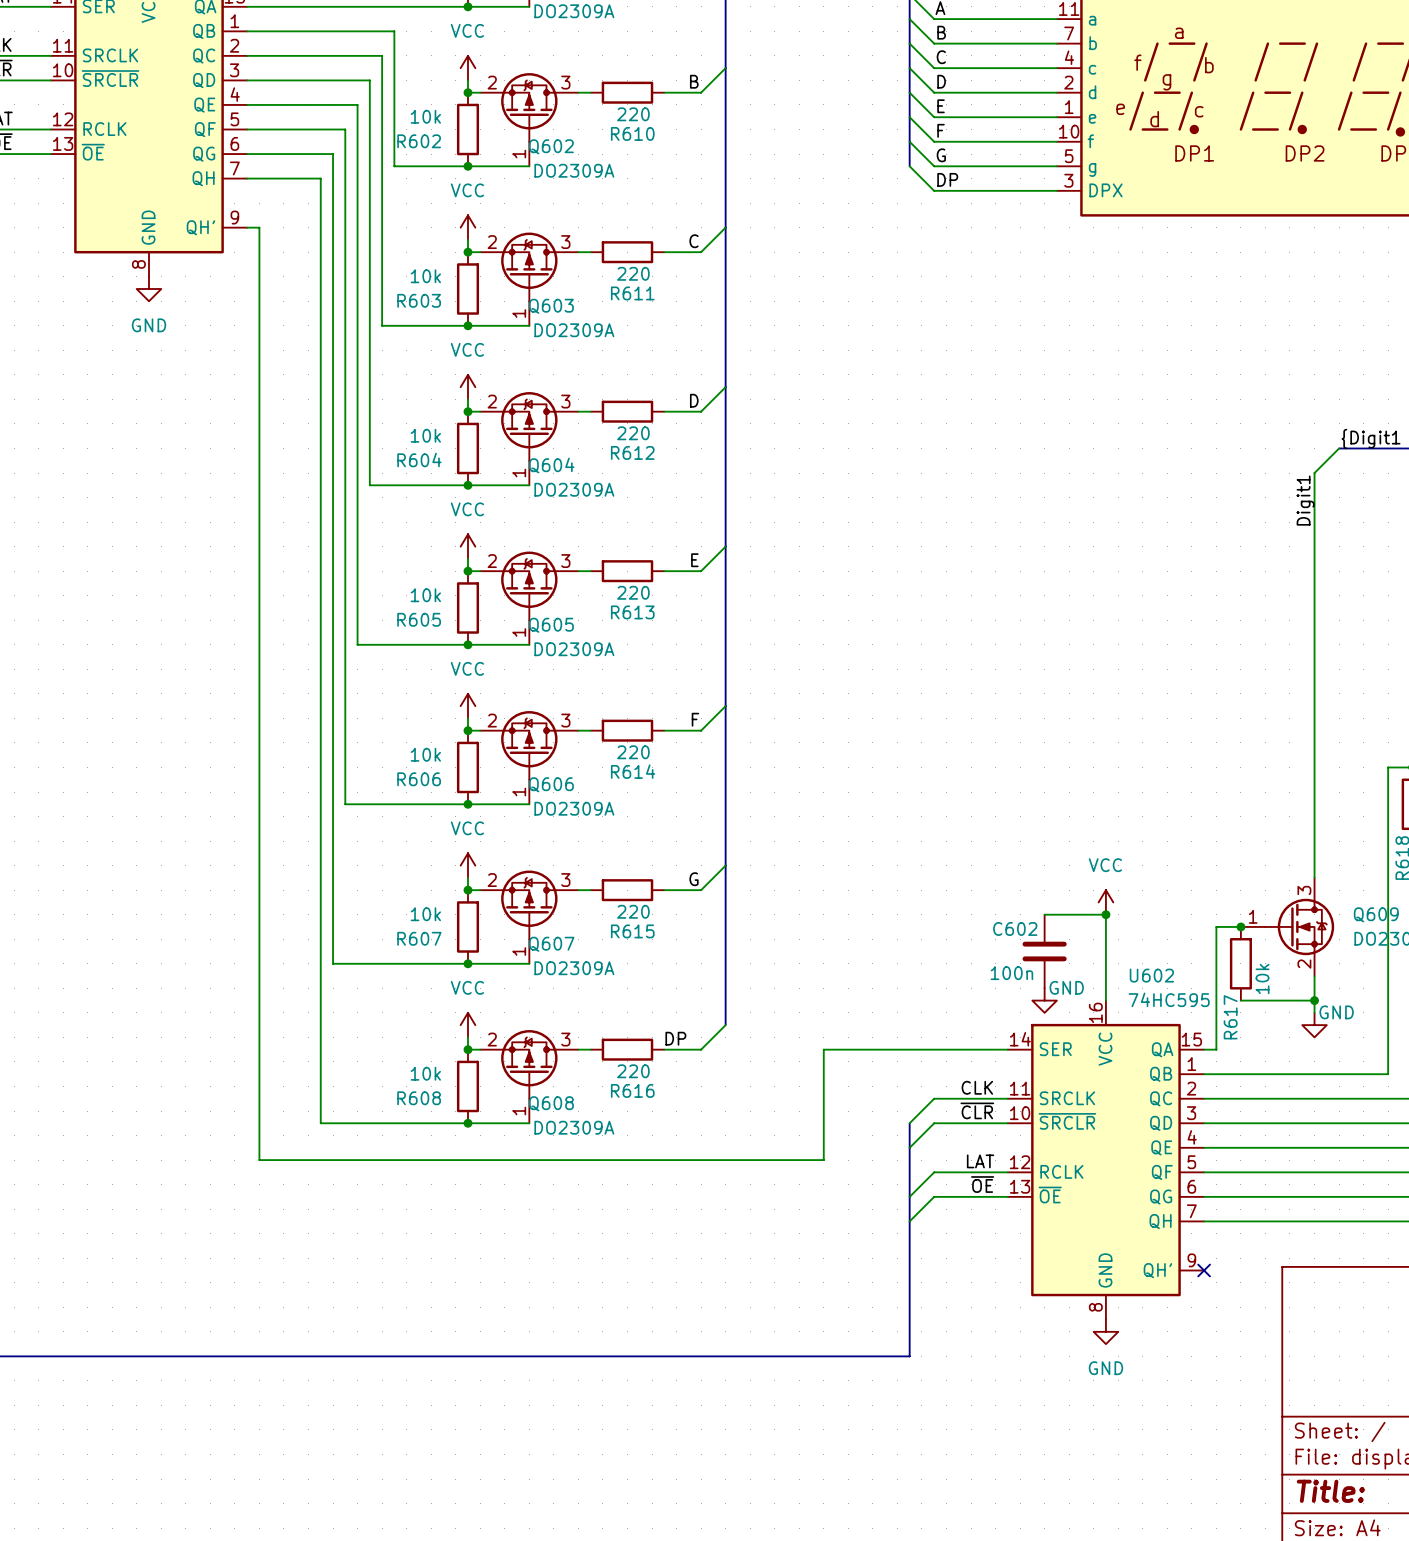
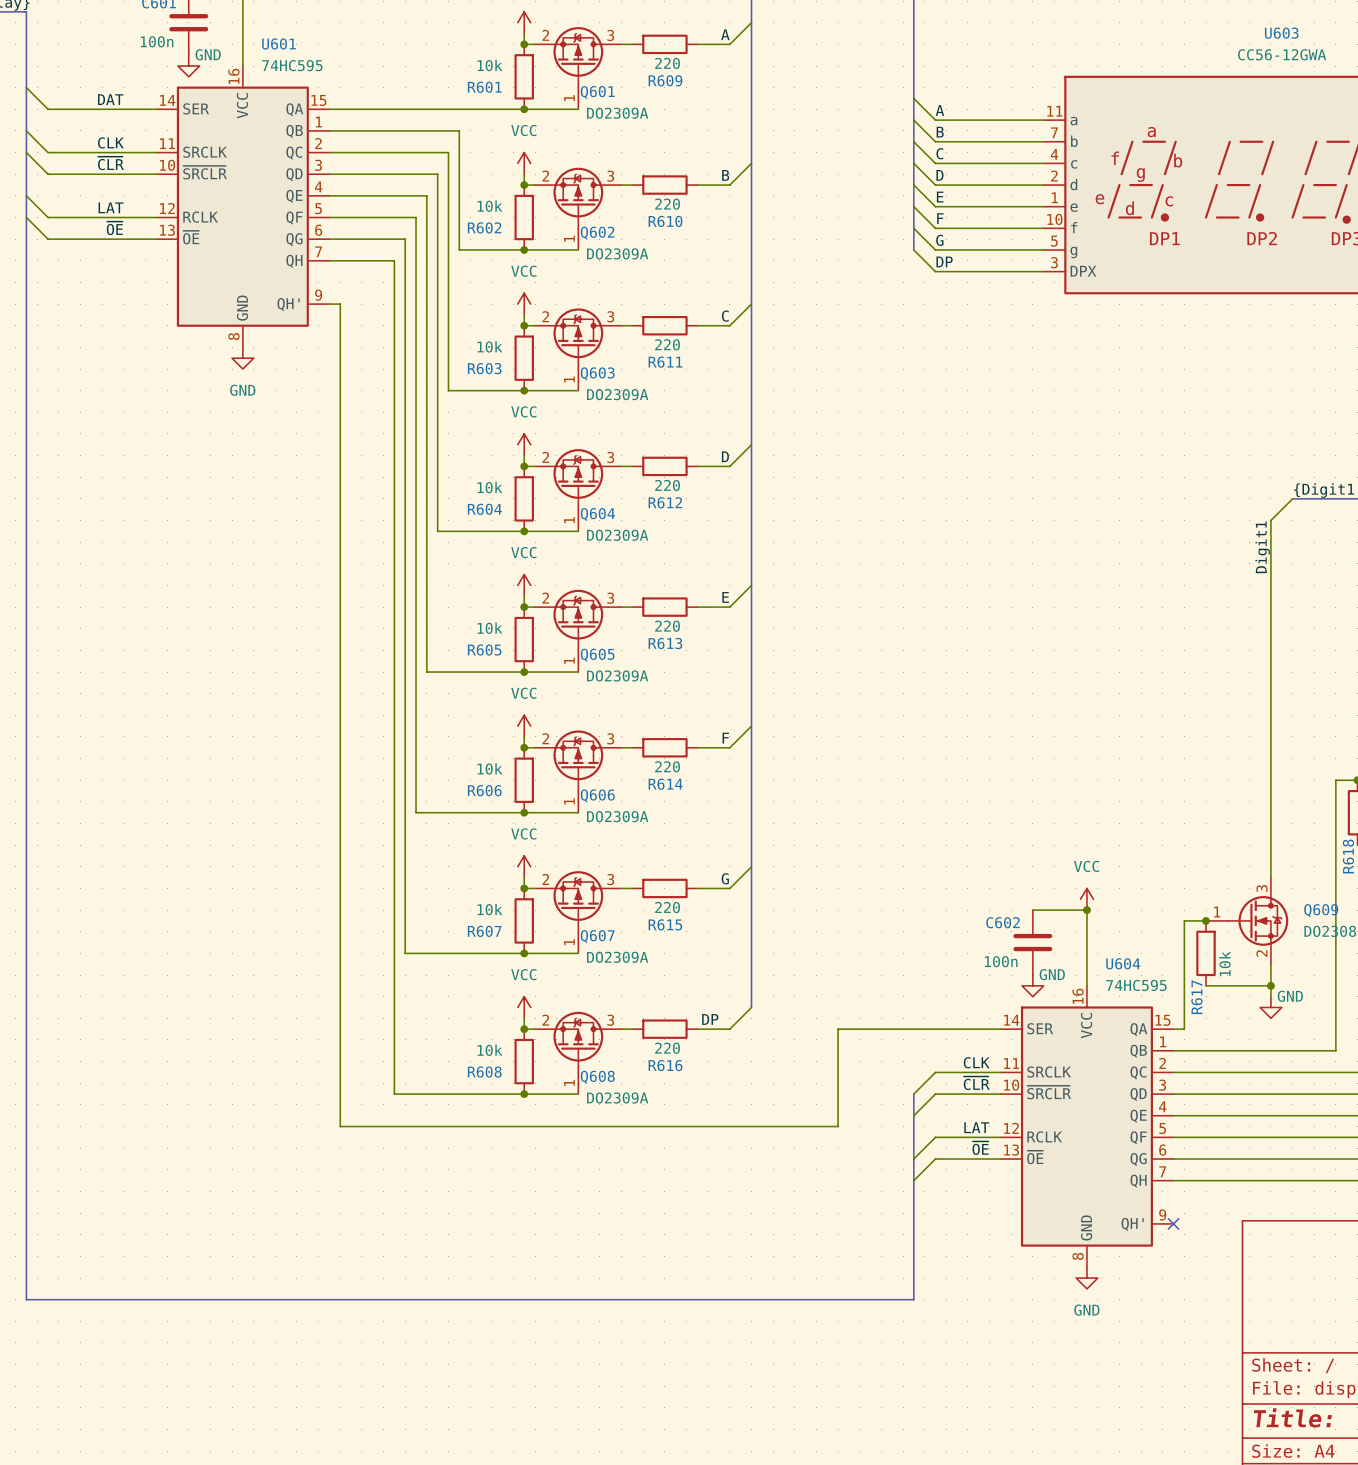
U602 name: U602 (1151, 975) -> U604 (1123, 963)

